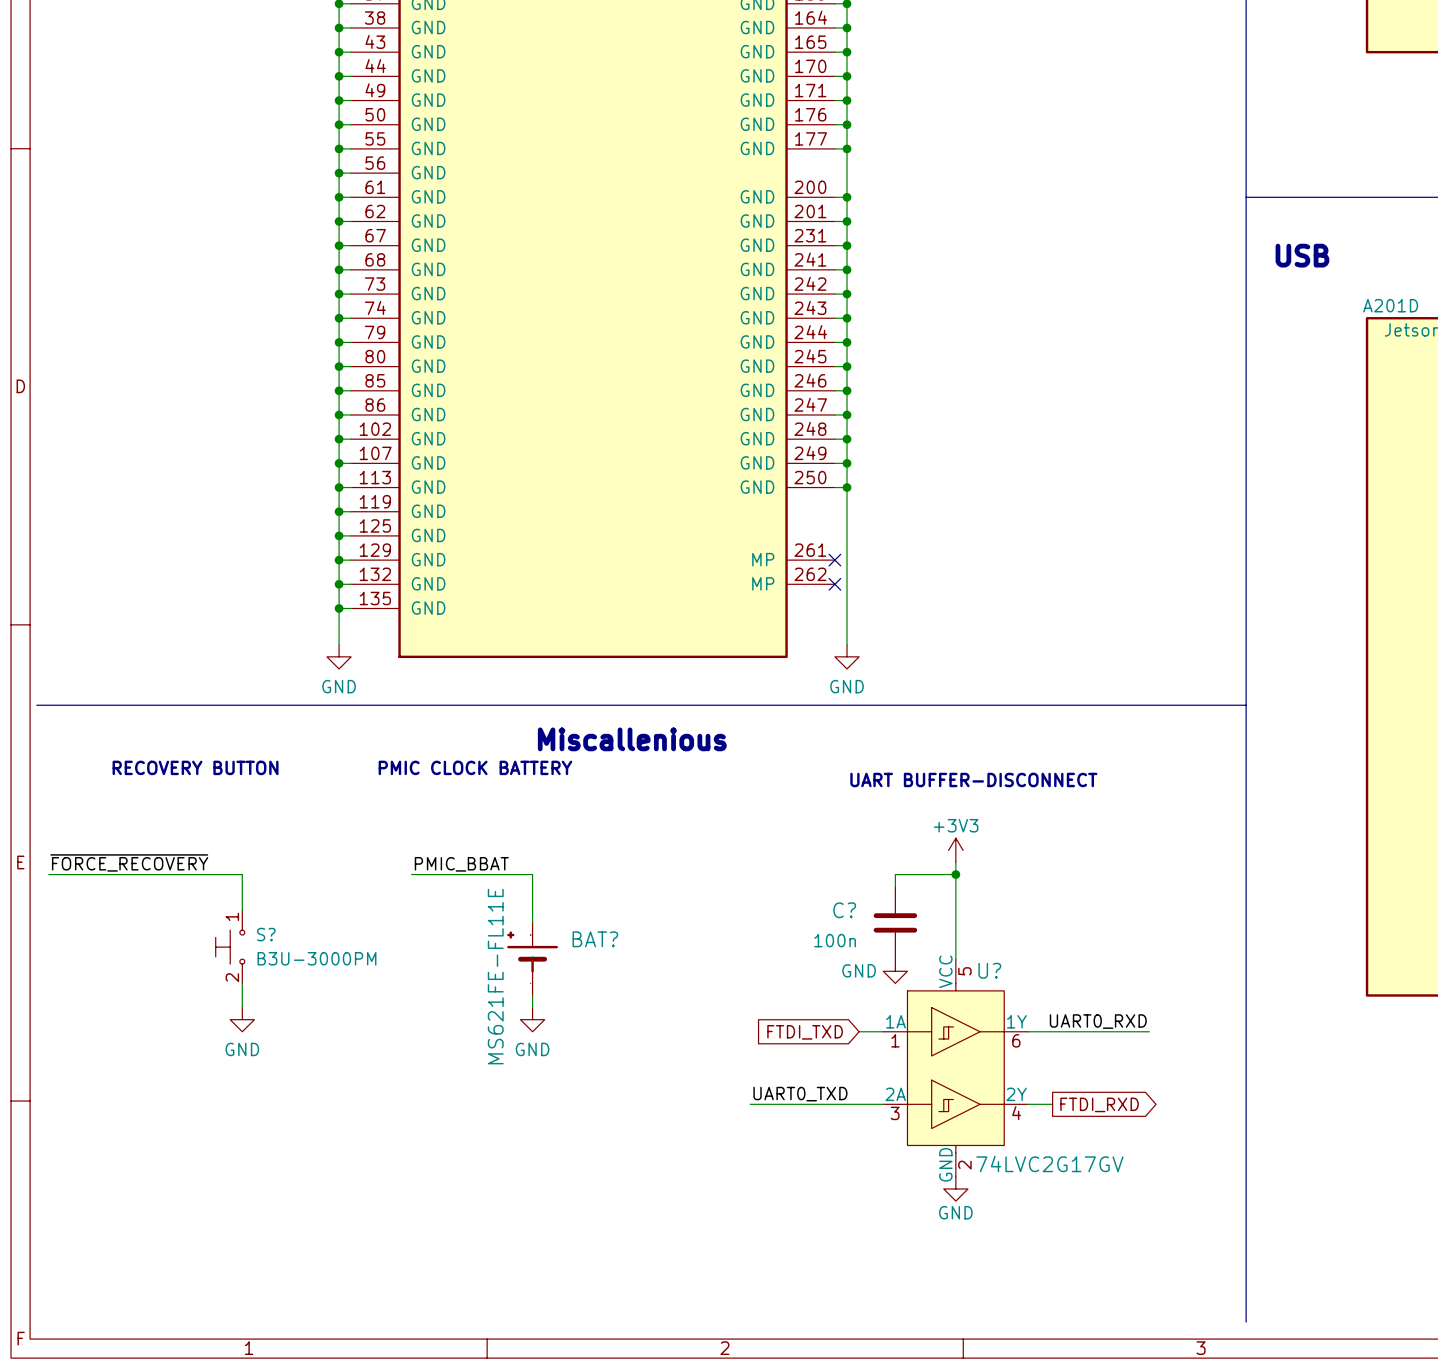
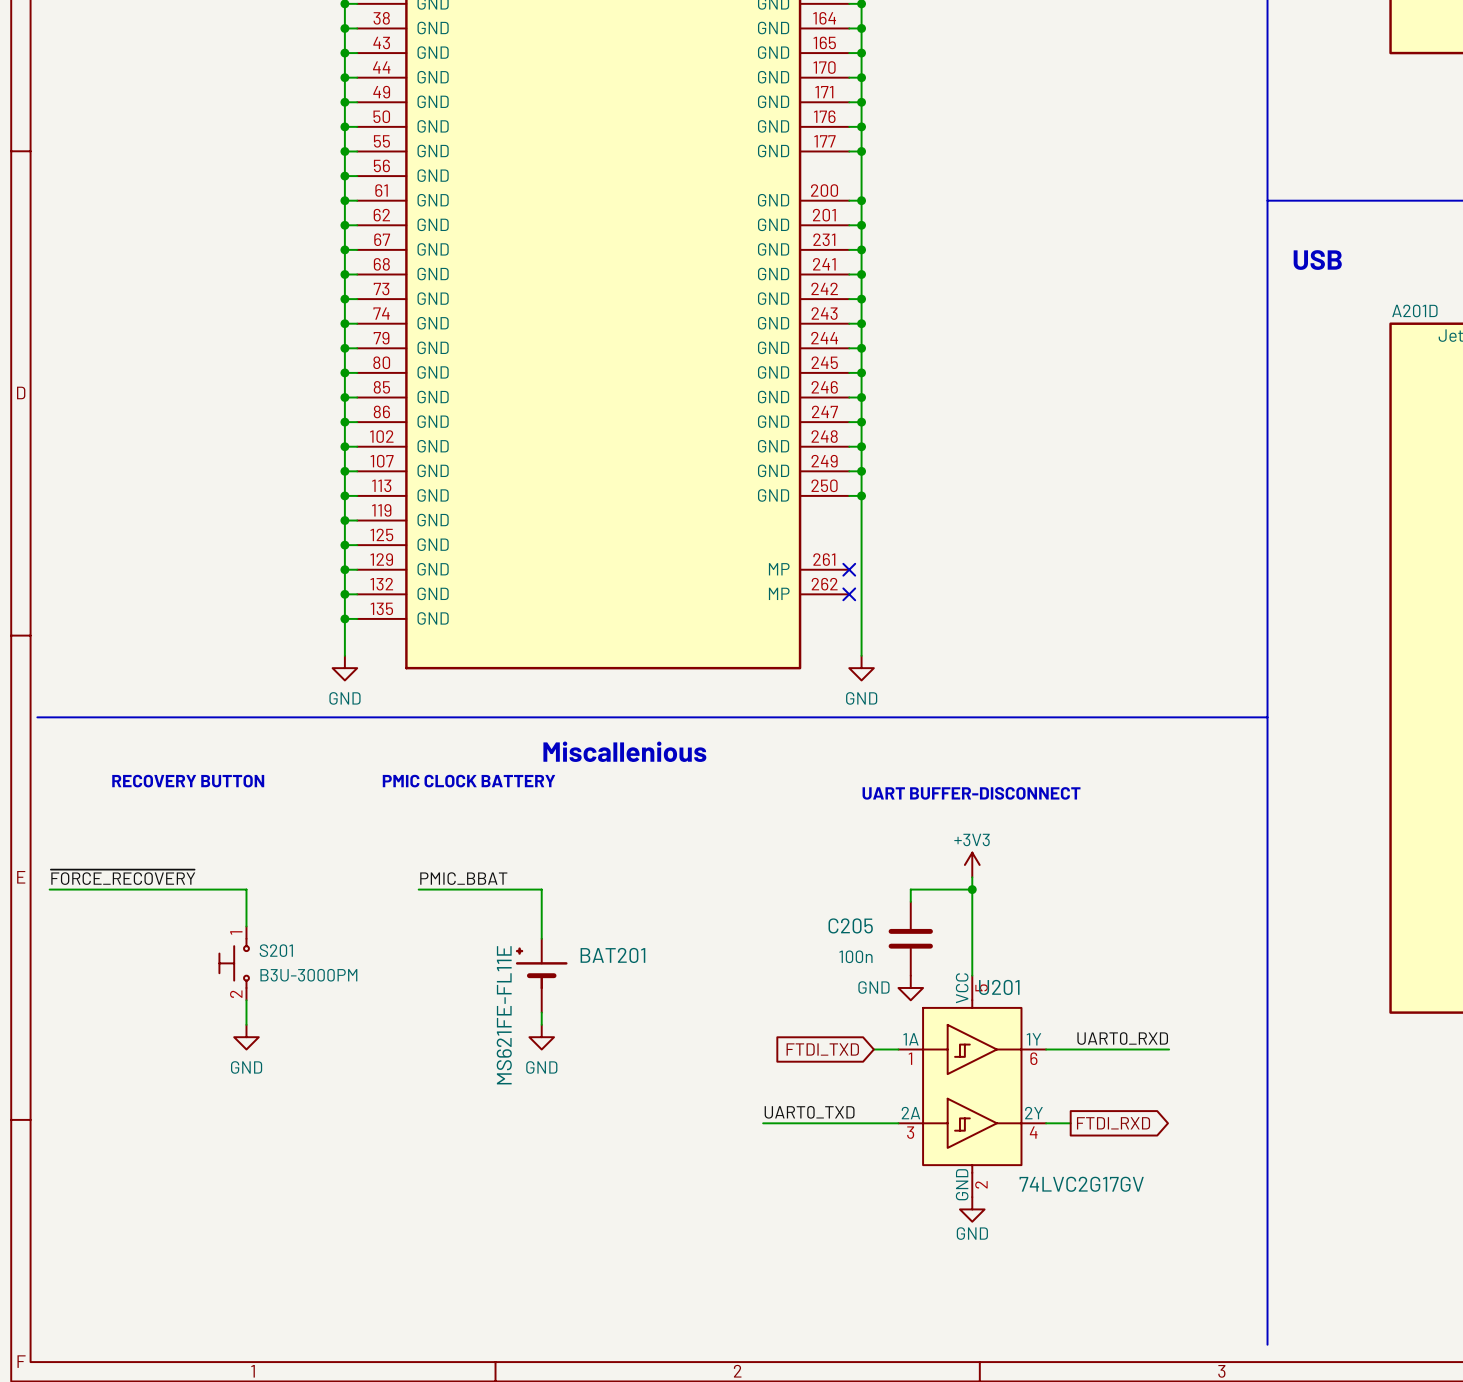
C? name: C? (844, 910) -> C205 (850, 925)
S? name: S? (266, 934) -> S201 (276, 950)
BAT? name: BAT? (595, 939) -> BAT201 (612, 955)
U? name: U? (989, 970) -> U201 (999, 987)

